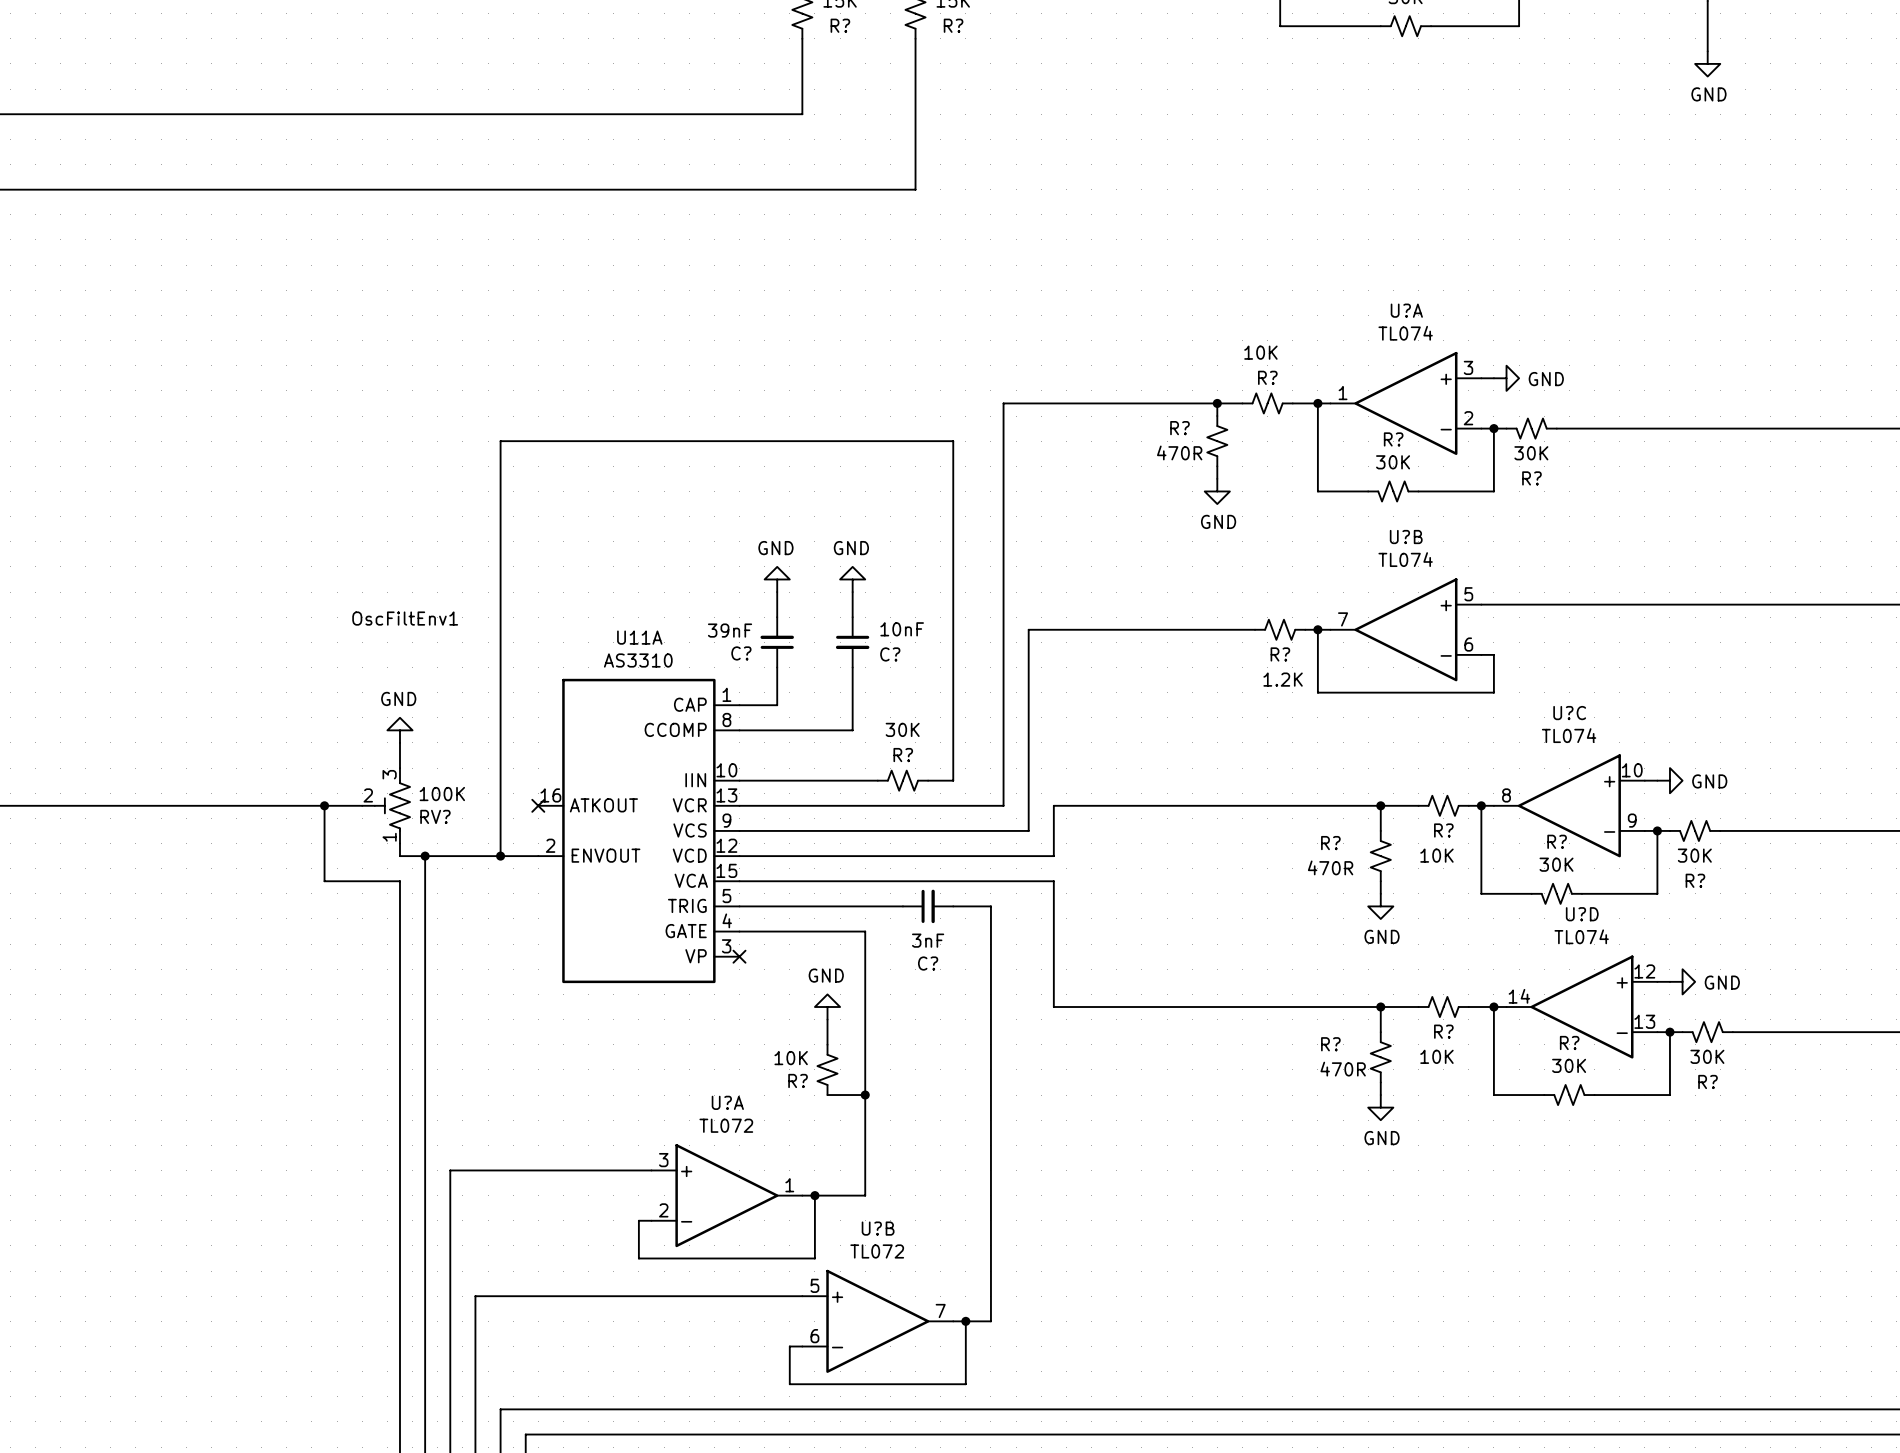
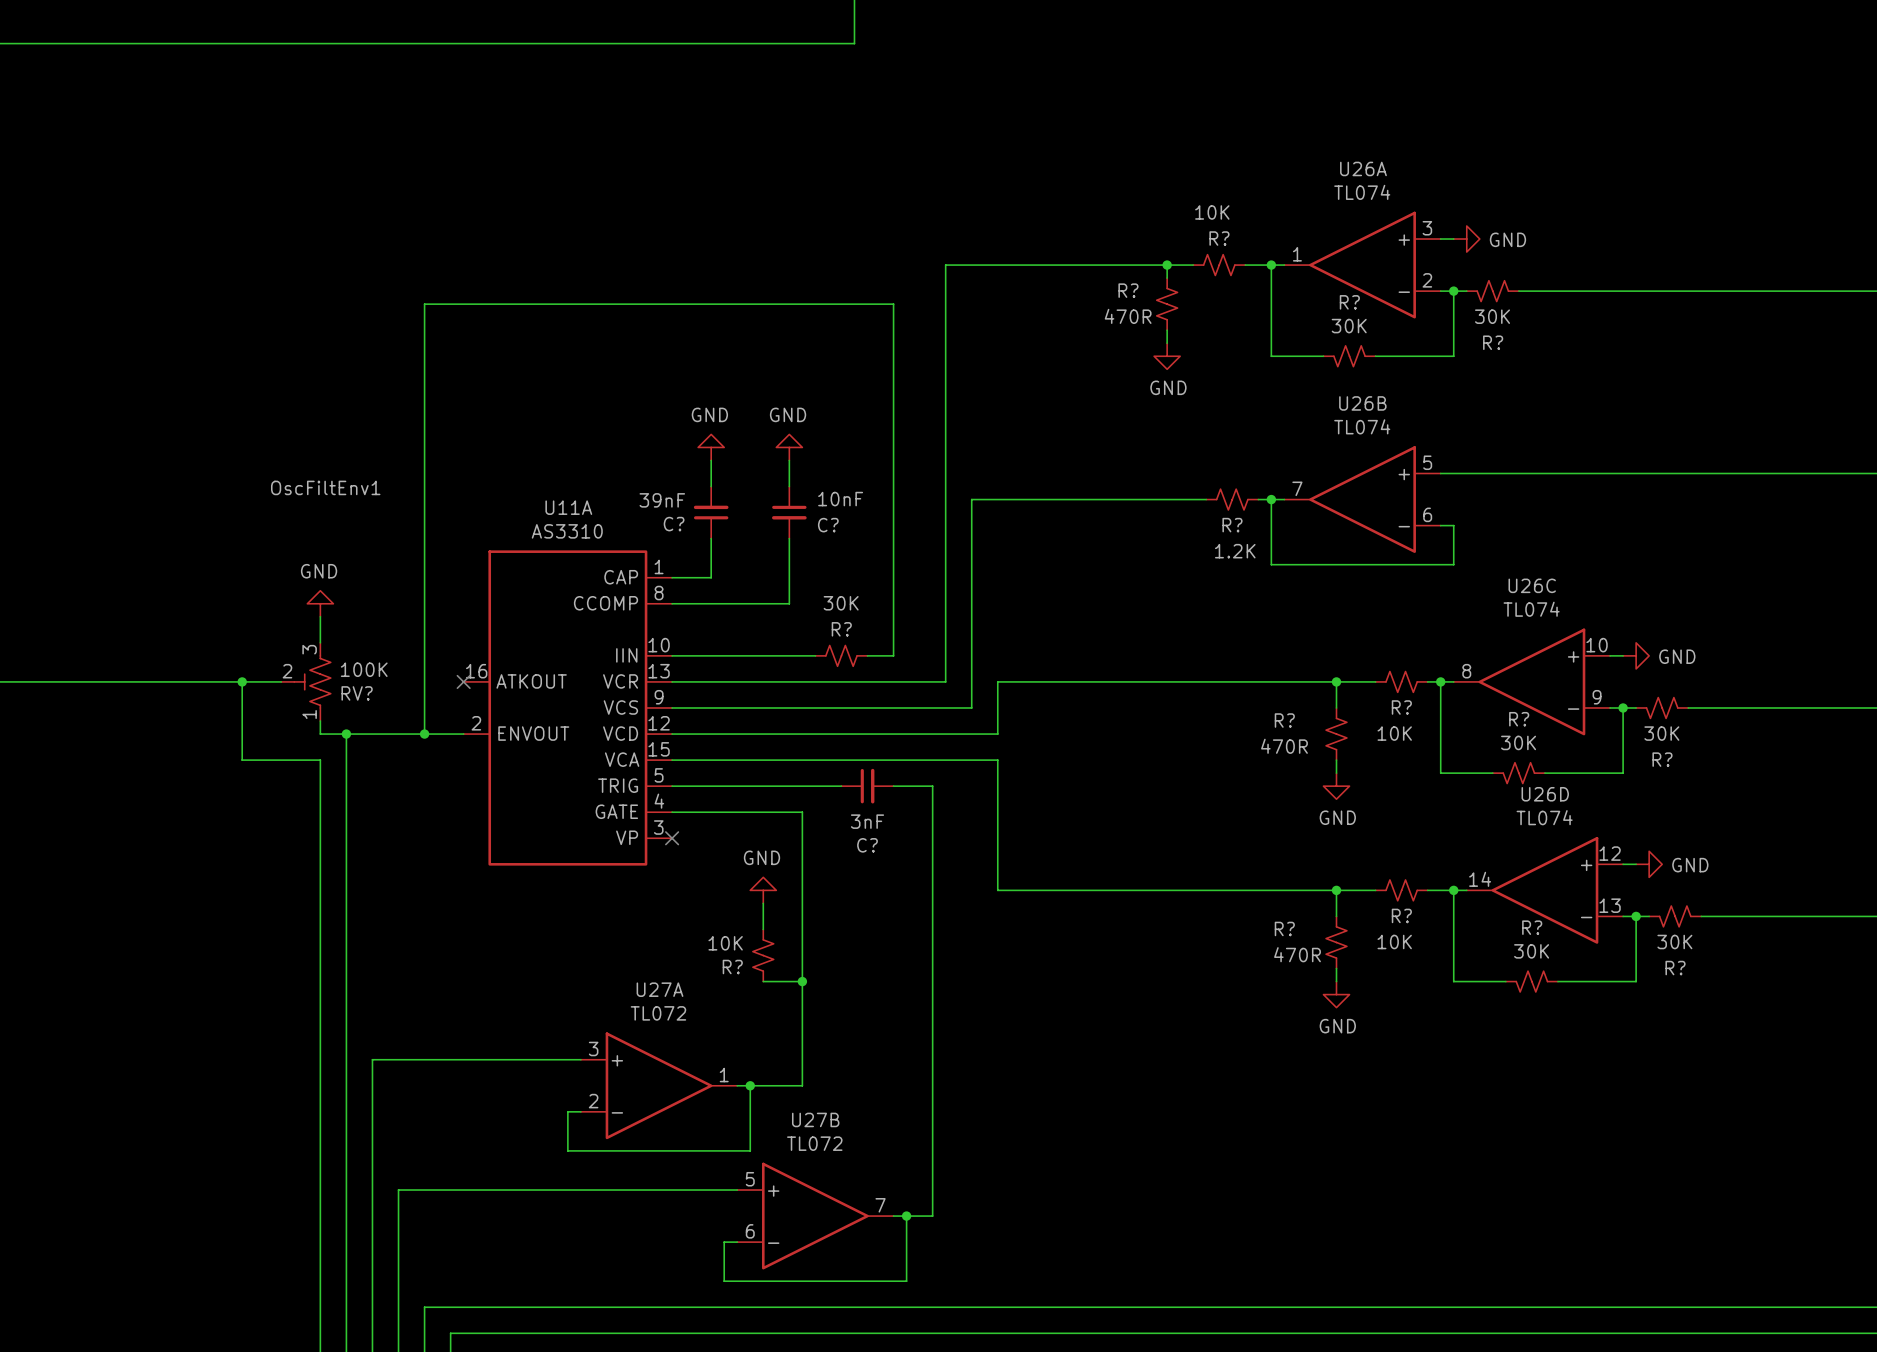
U?A name: U?A (1406, 310) -> U26A (1363, 168)
U?B name: U?B (1406, 537) -> U26B (1362, 403)
U?C name: U?C (1569, 713) -> U26C (1532, 585)
U?D name: U?D (1582, 914) -> U26D (1545, 794)
U?A name: U?A (727, 1102) -> U27A (660, 989)
U?B name: U?B (878, 1228) -> U27B (815, 1119)

